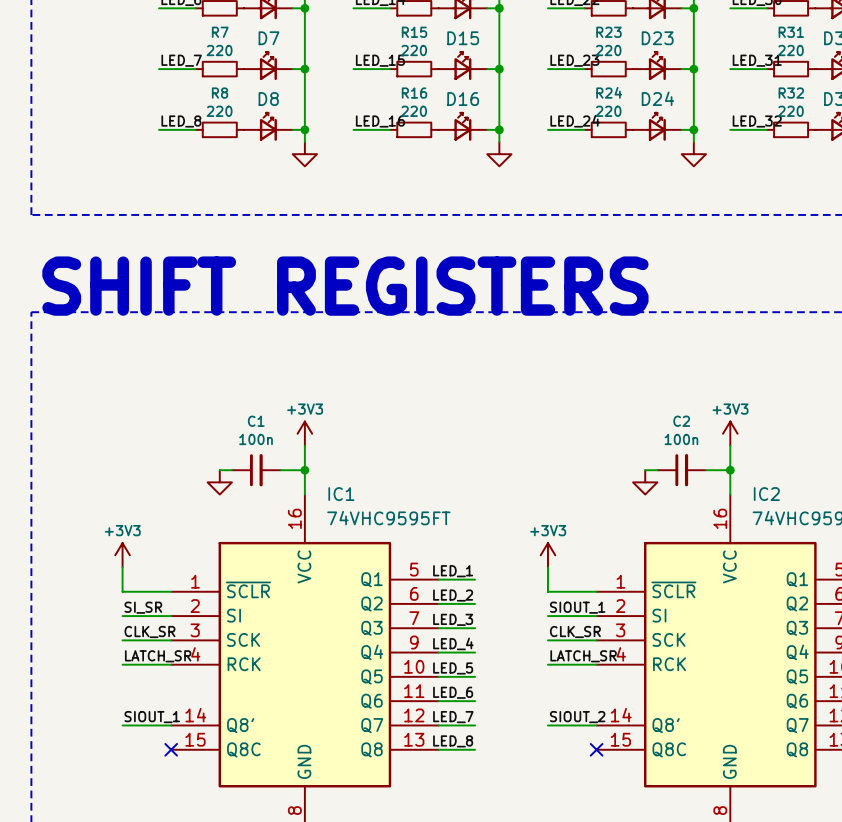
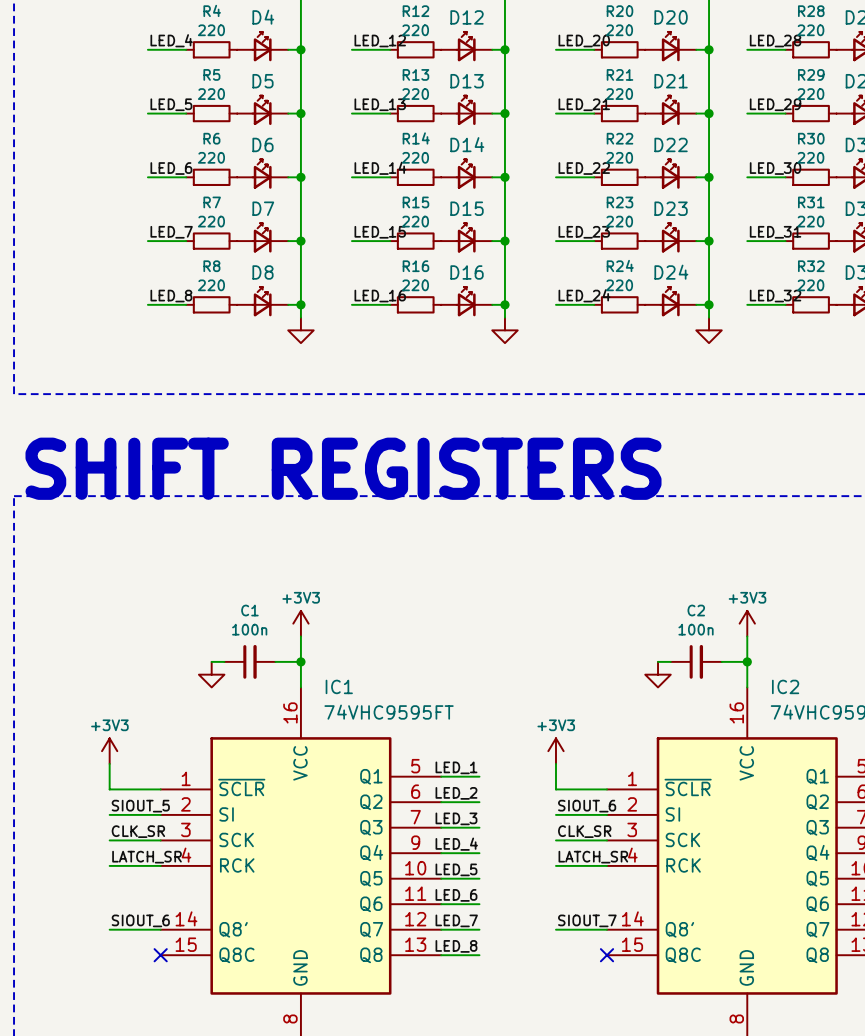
label: SI_SR (143, 607) -> SIOUT_5 (140, 806)
label: SIOUT_1 (577, 607) -> SIOUT_6 (587, 806)
label: SIOUT_1 (152, 717) -> SIOUT_6 (140, 920)
label: SIOUT_2 (577, 717) -> SIOUT_7 (587, 920)

